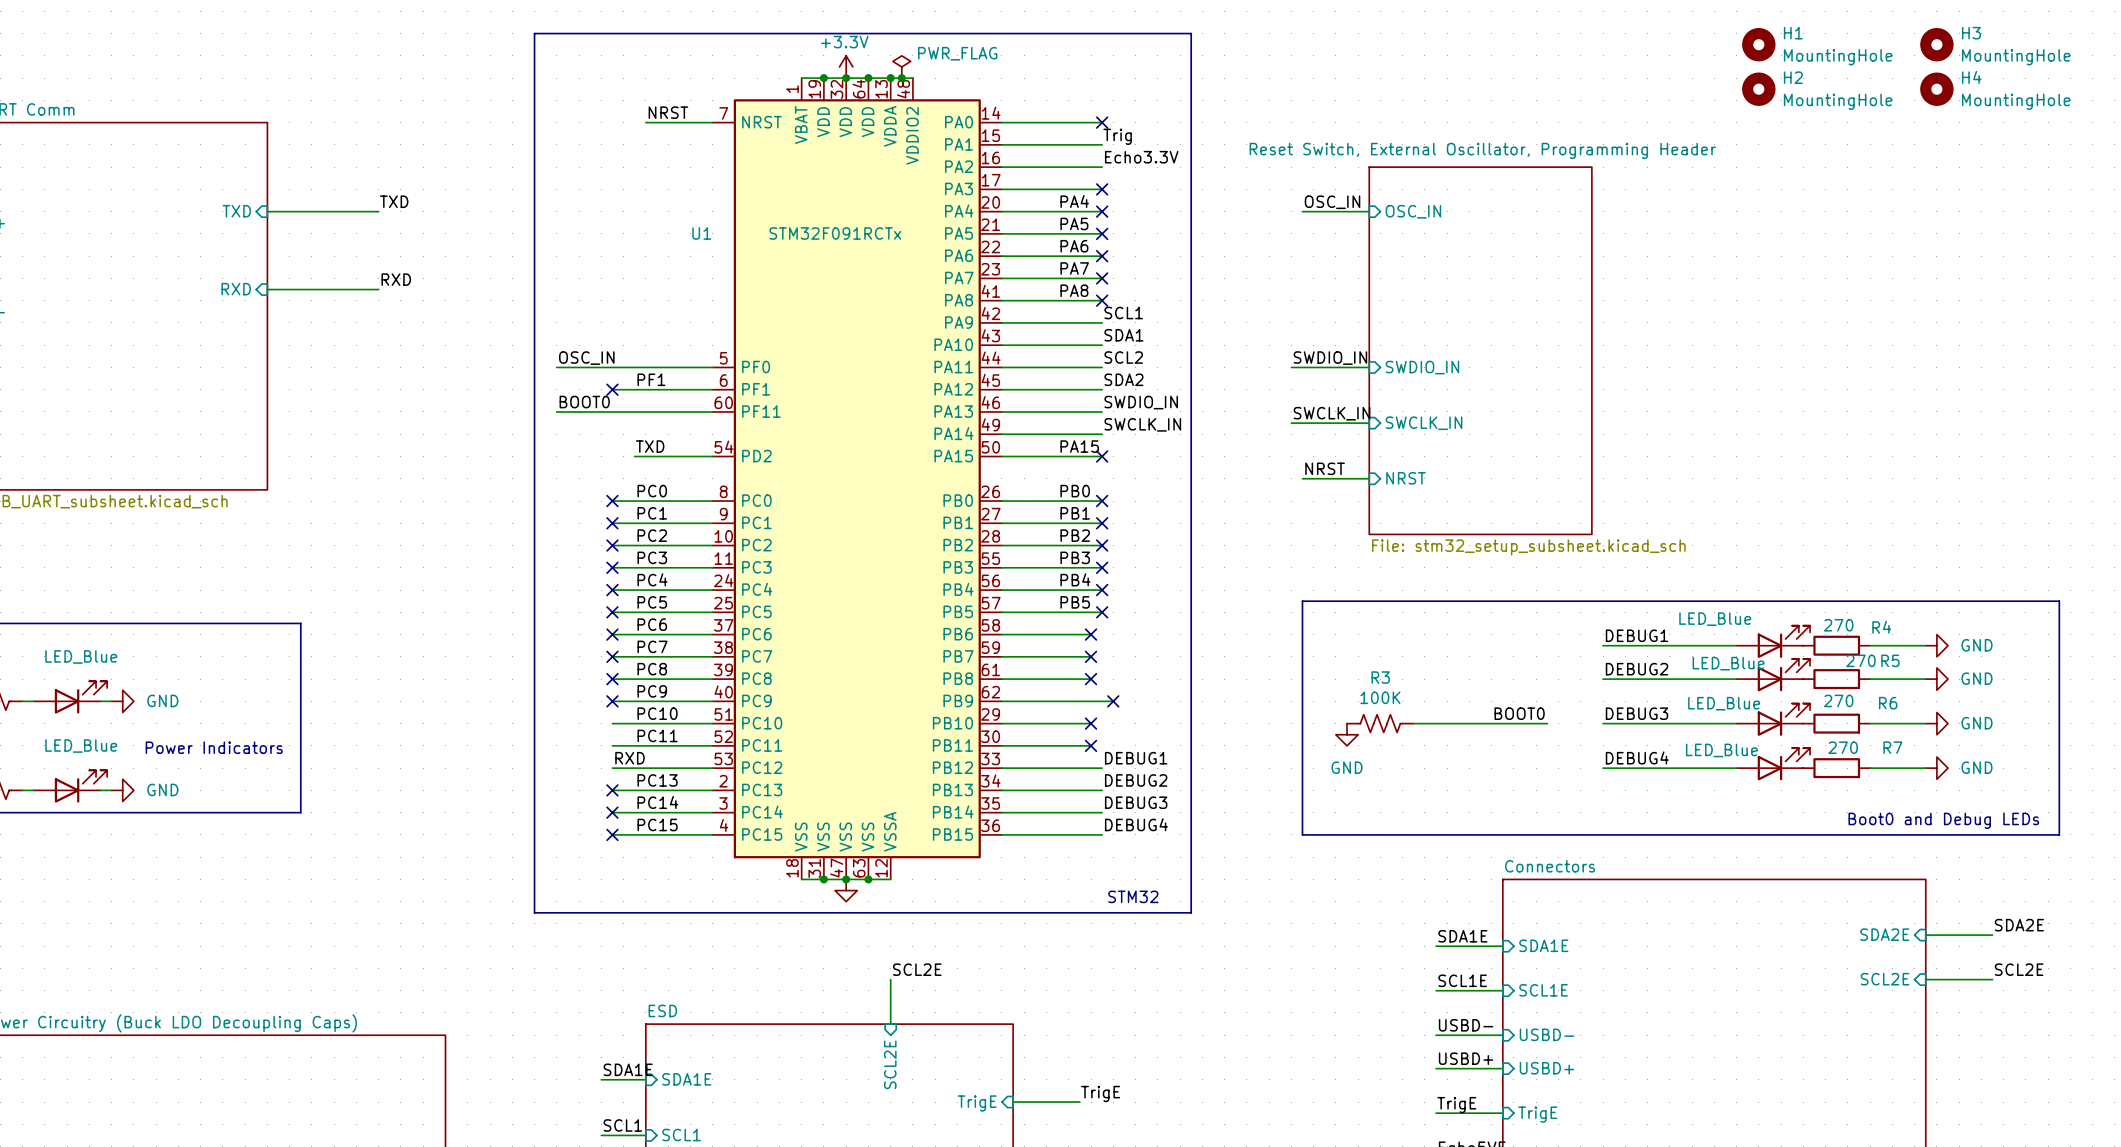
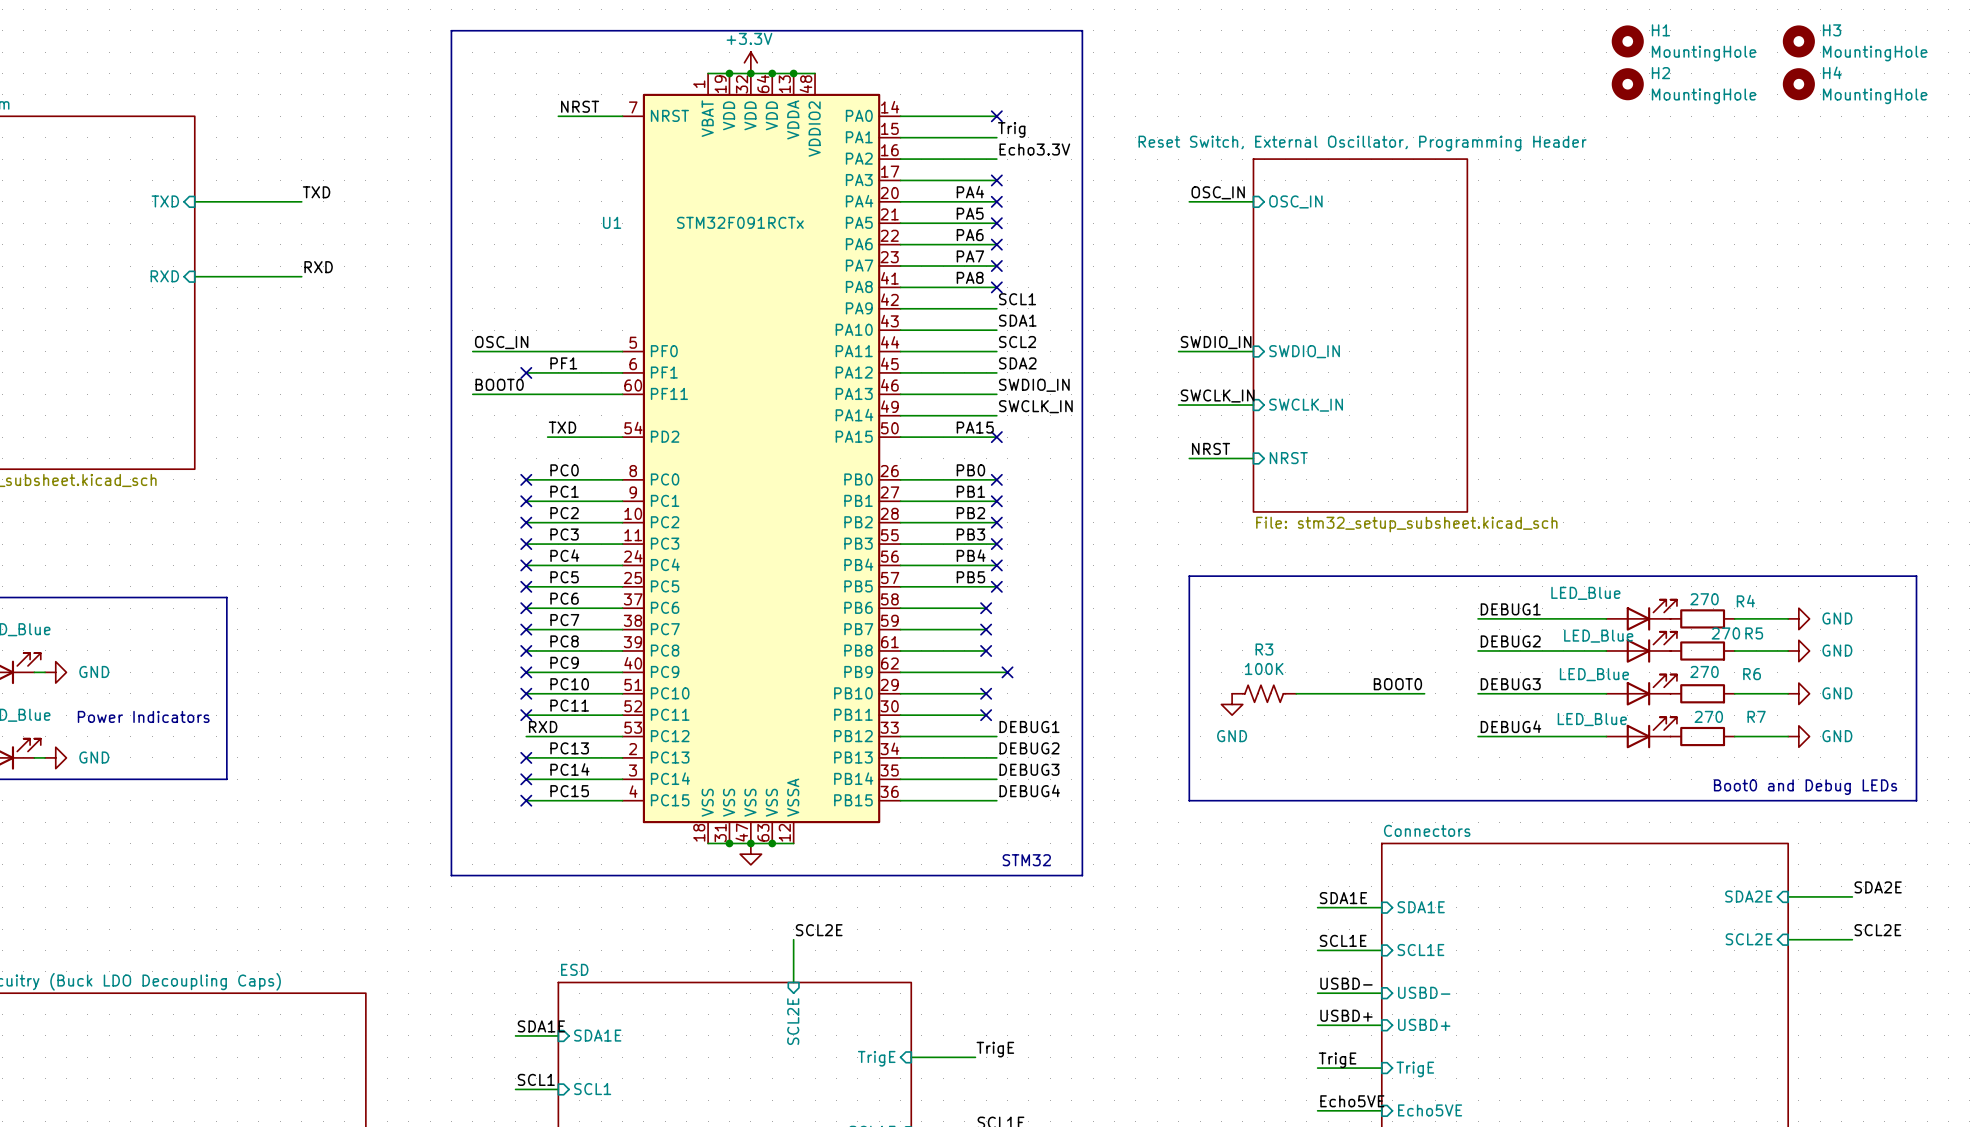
power symbol: PWR_FLAG (901, 66) -> none
junction: (901, 78) -> none
no-connect mark: none -> (526, 693)
no-connect mark: none -> (526, 715)

